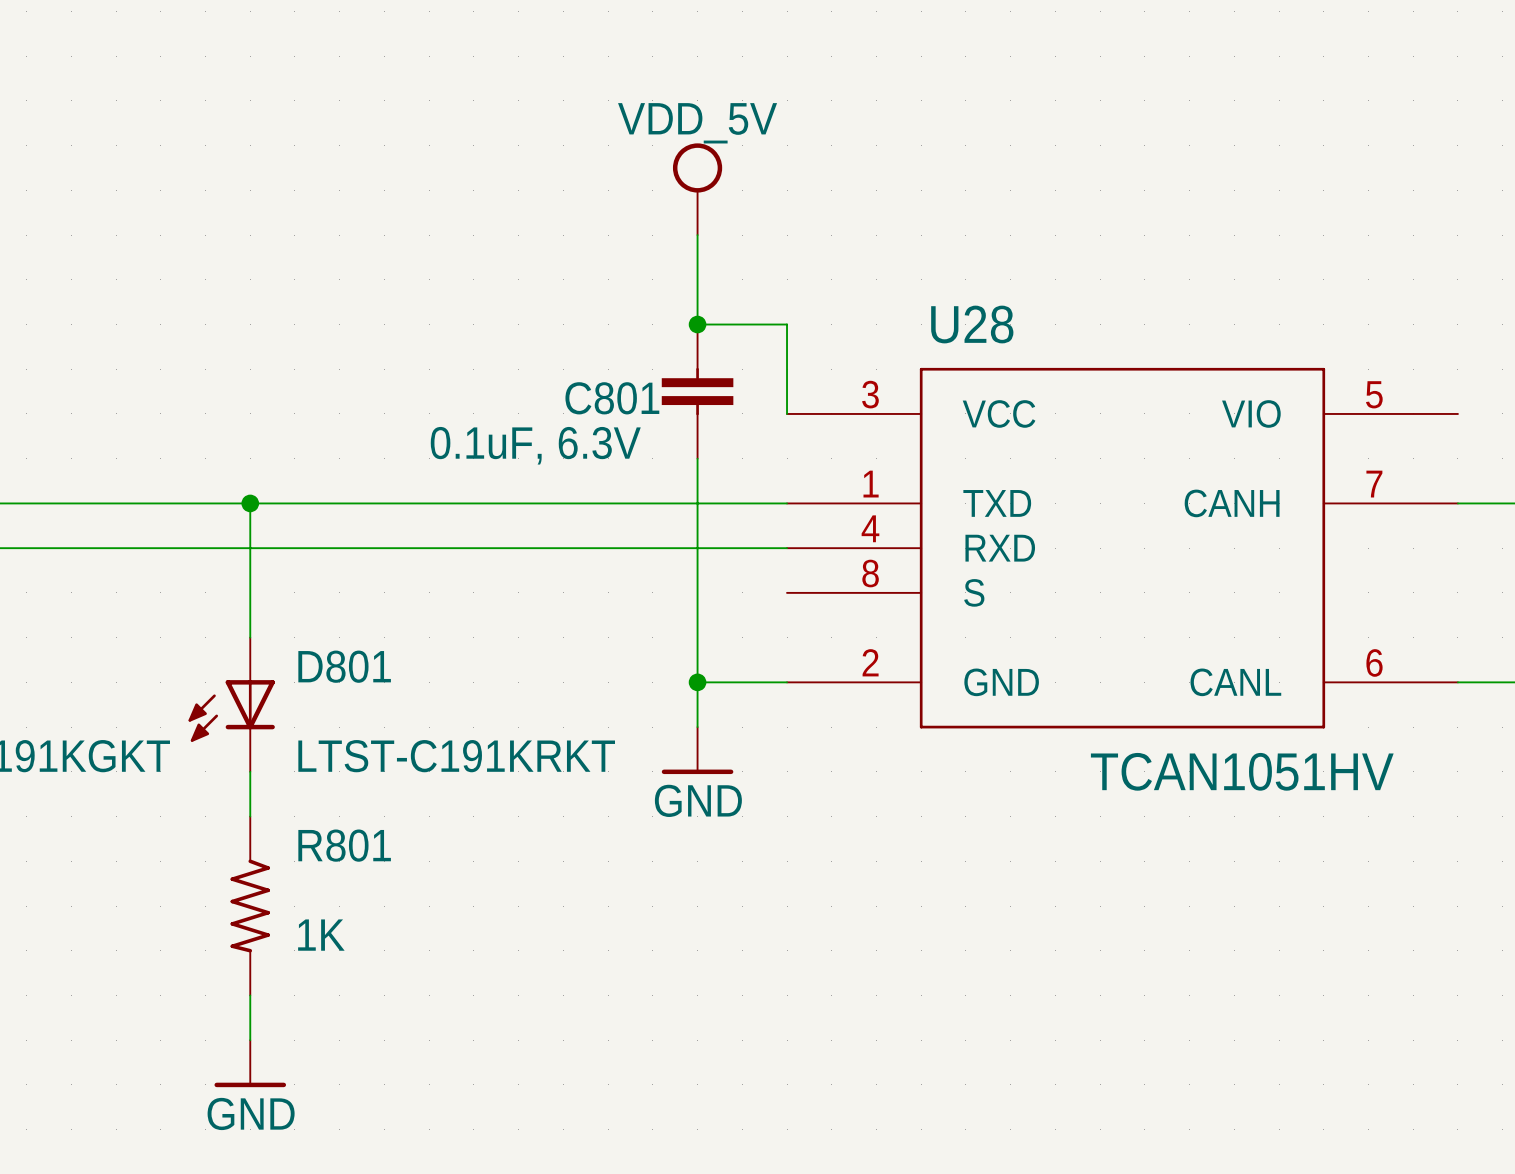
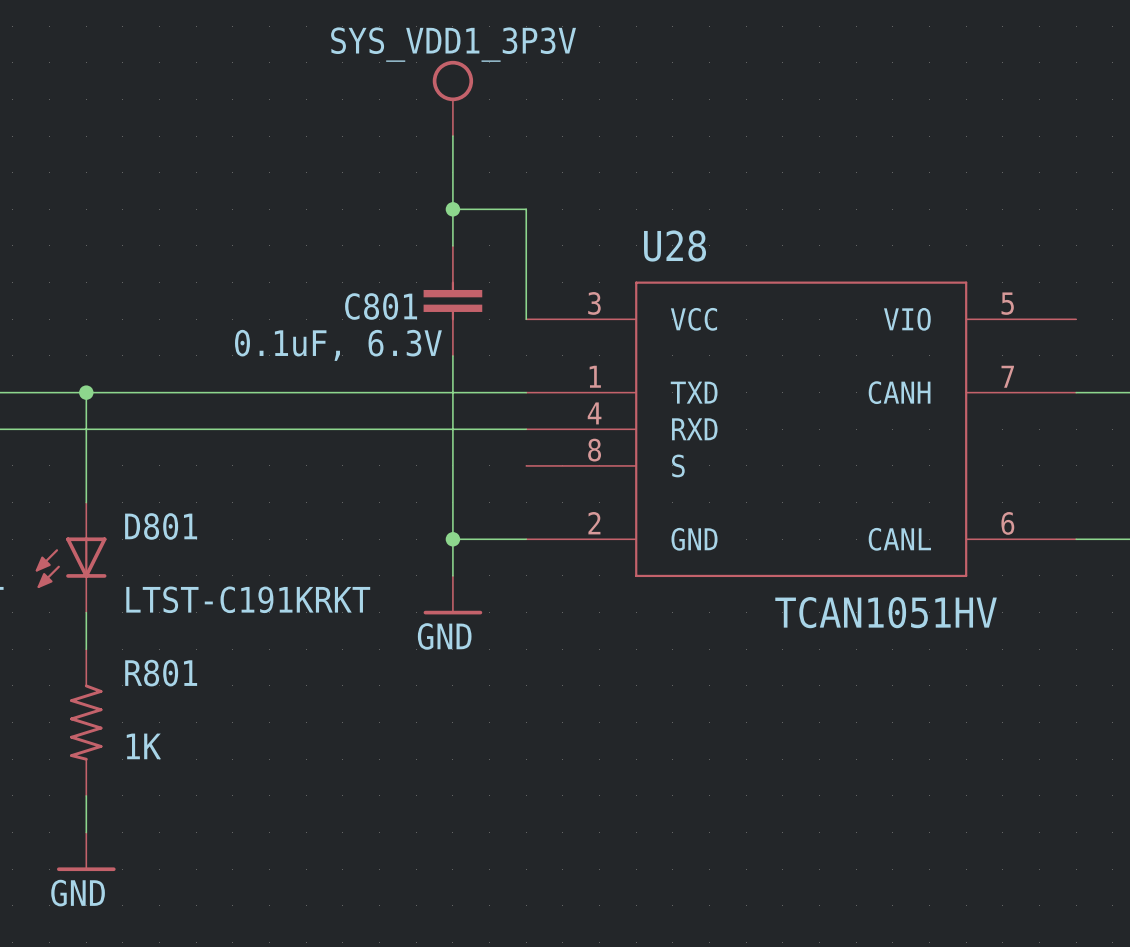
power symbol: none -> SYS_VDD1_3P3V (452, 98)
power symbol: VDD_5V (697, 189) -> none
wire: (697, 324) (787, 324) -> (452, 209) (526, 209) (526, 245)
junction position: (697, 324) -> (452, 209)

